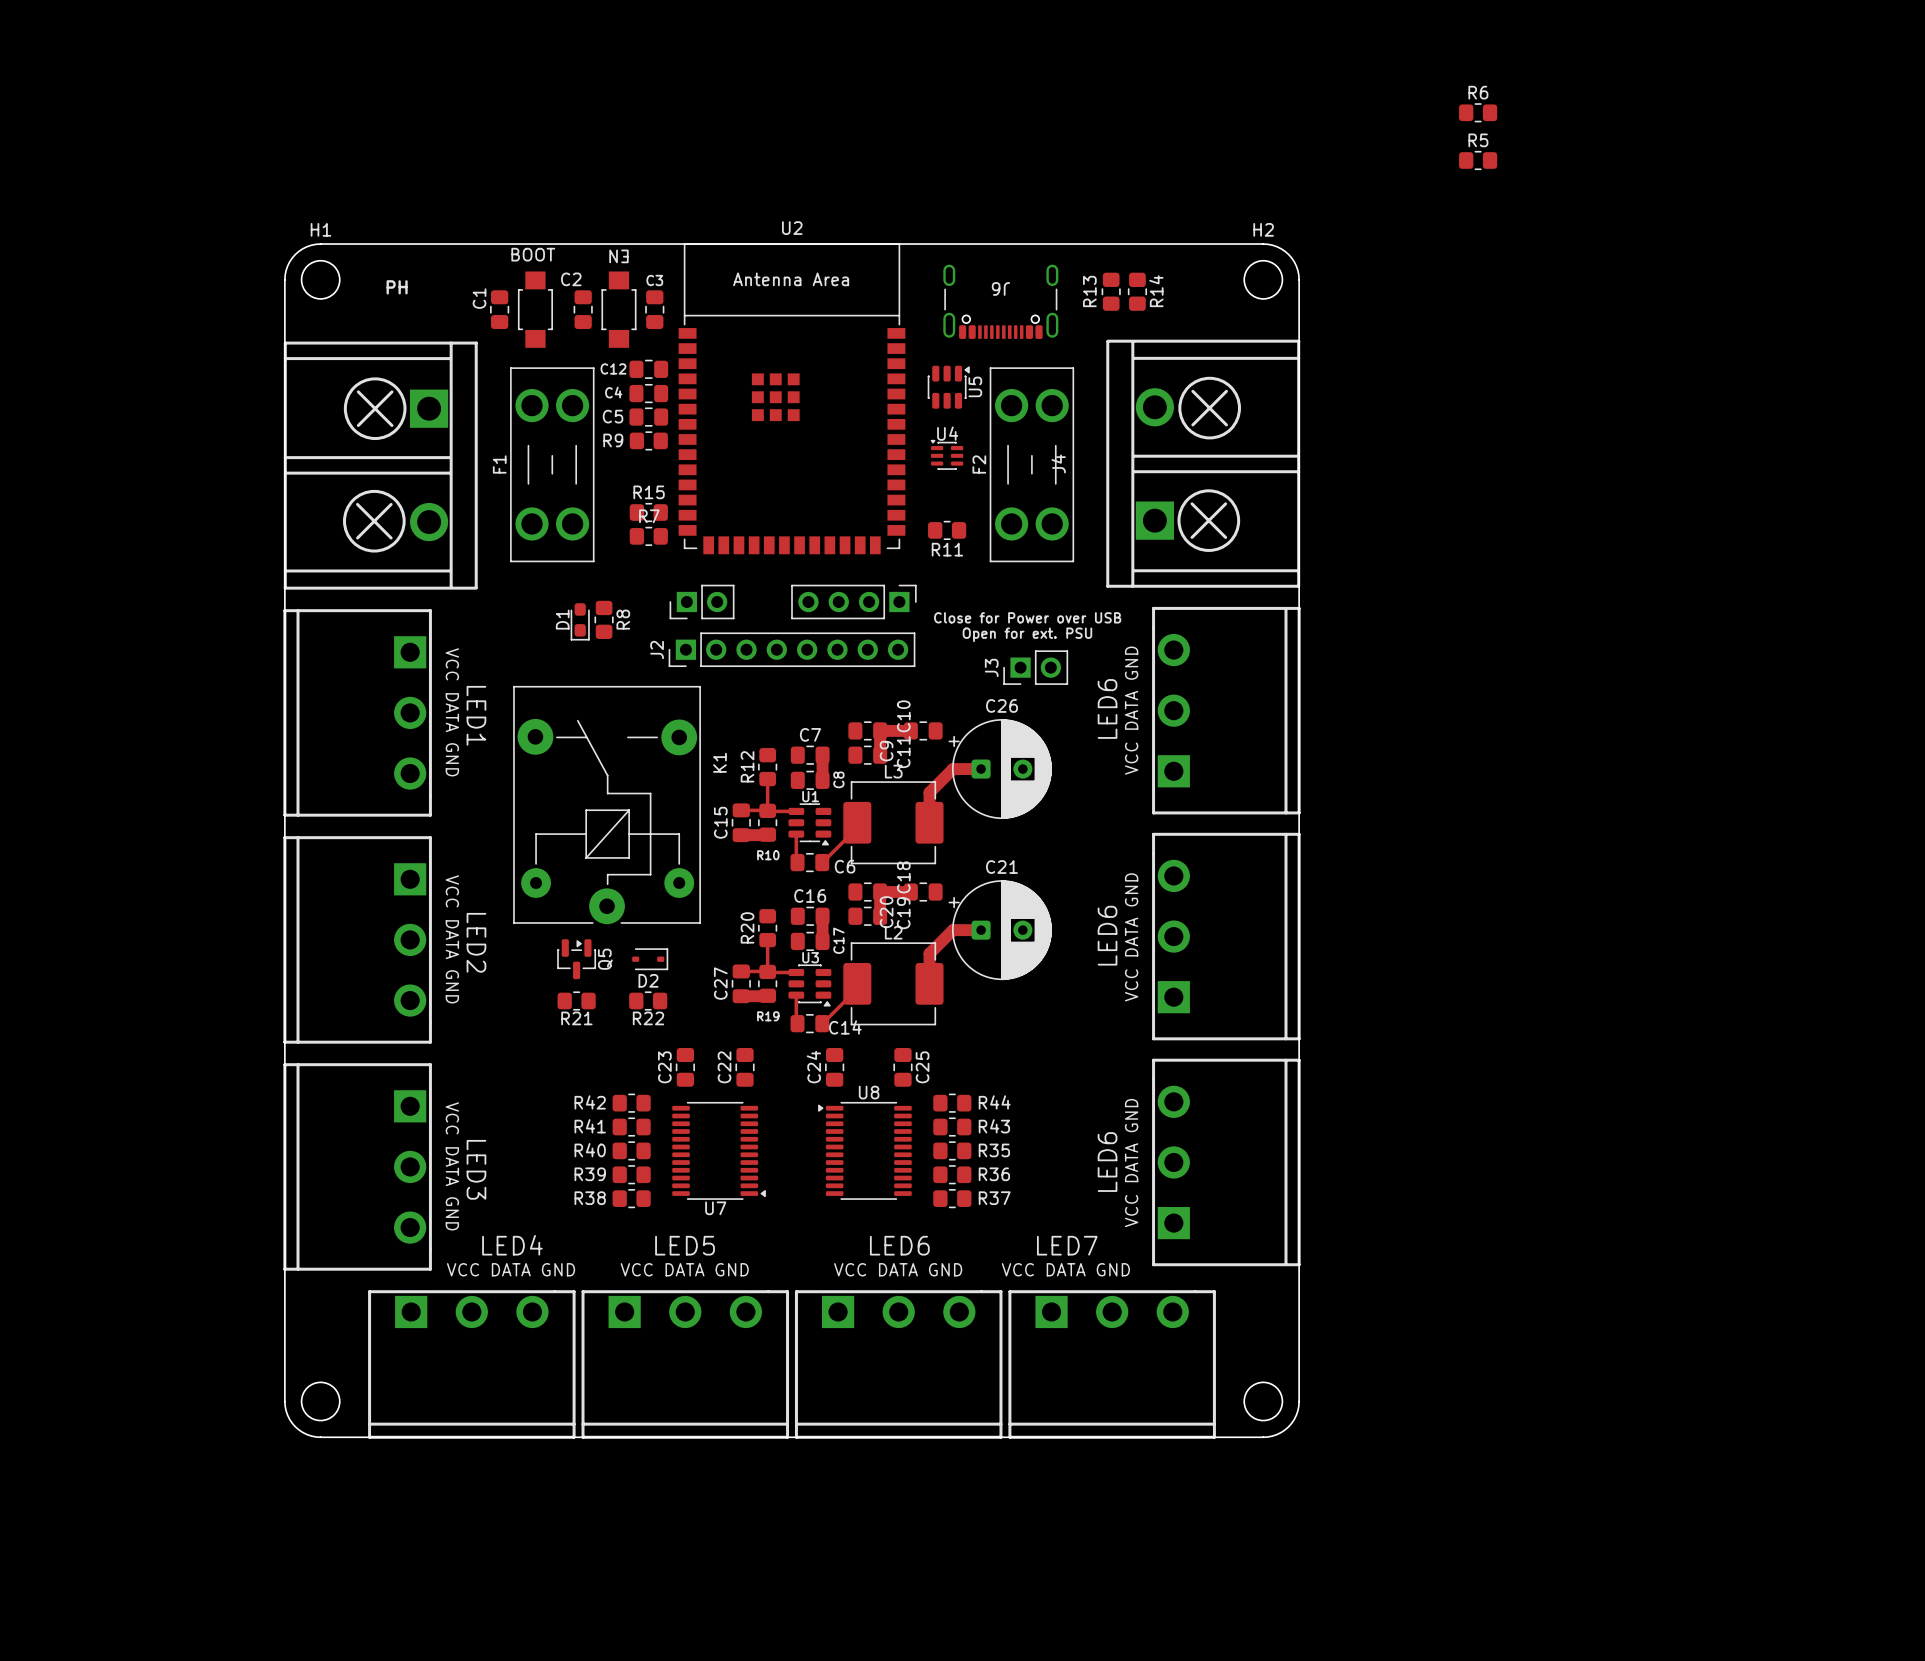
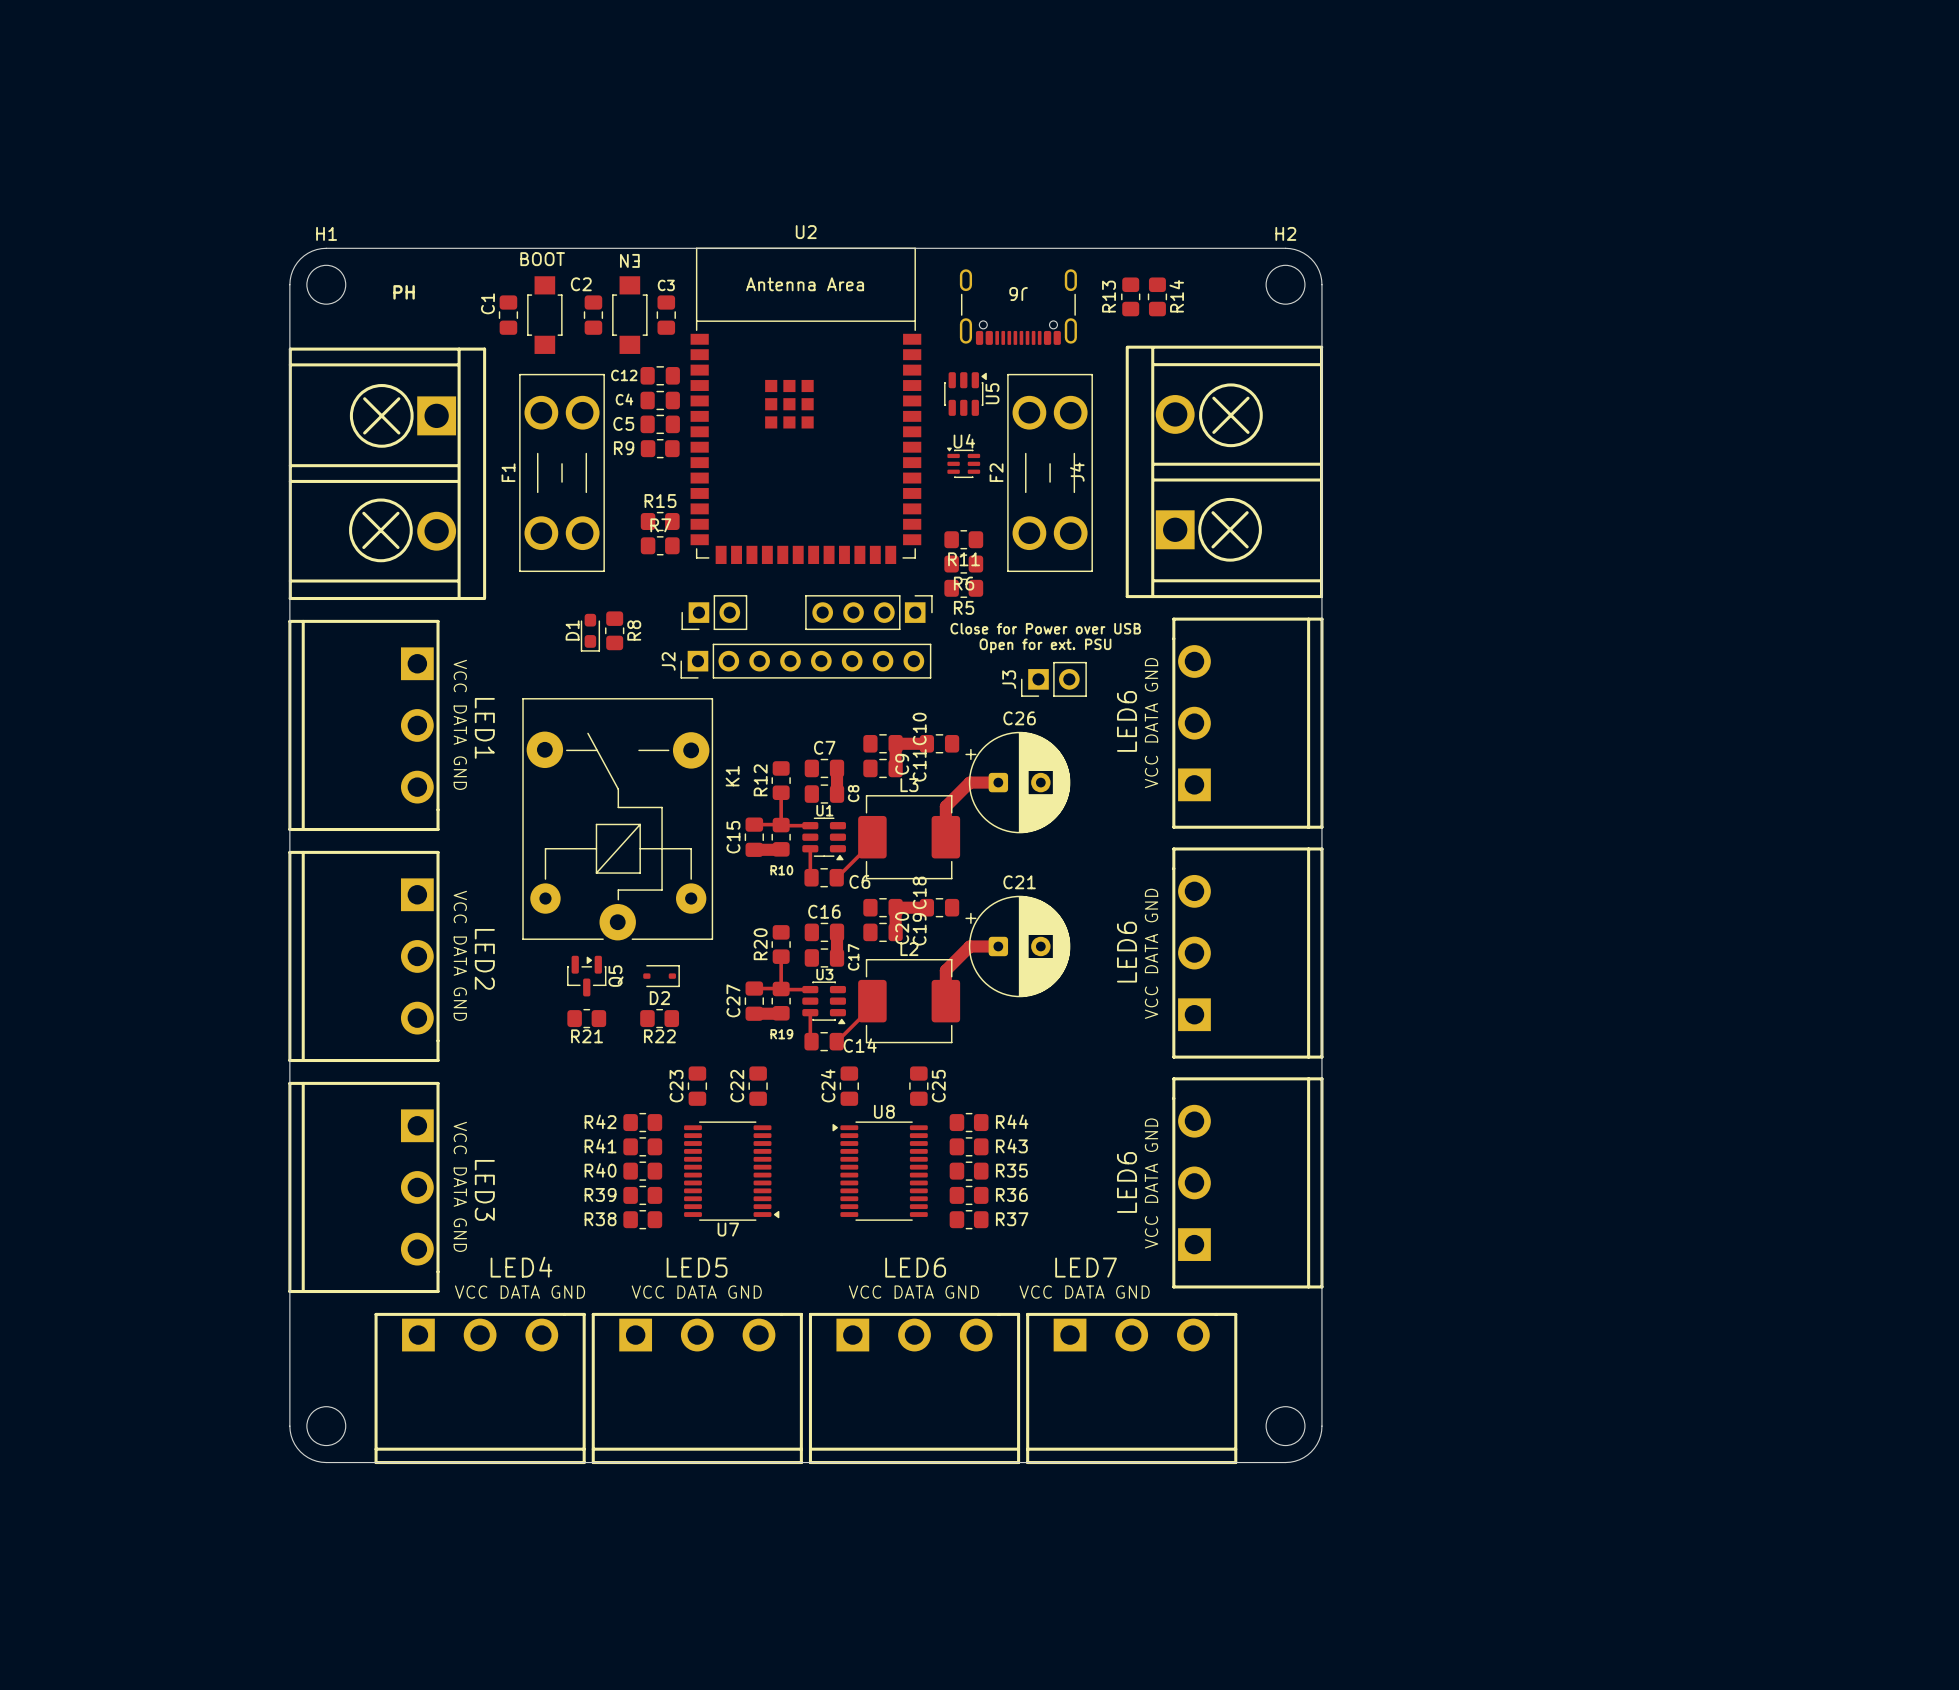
R6 name position: R6 (1478, 92) -> R6 (964, 583)
R6 position: (1478, 112) -> (963, 564)
R5 name position: R5 (1478, 140) -> R5 (964, 607)
R5 position: (1478, 160) -> (963, 588)

